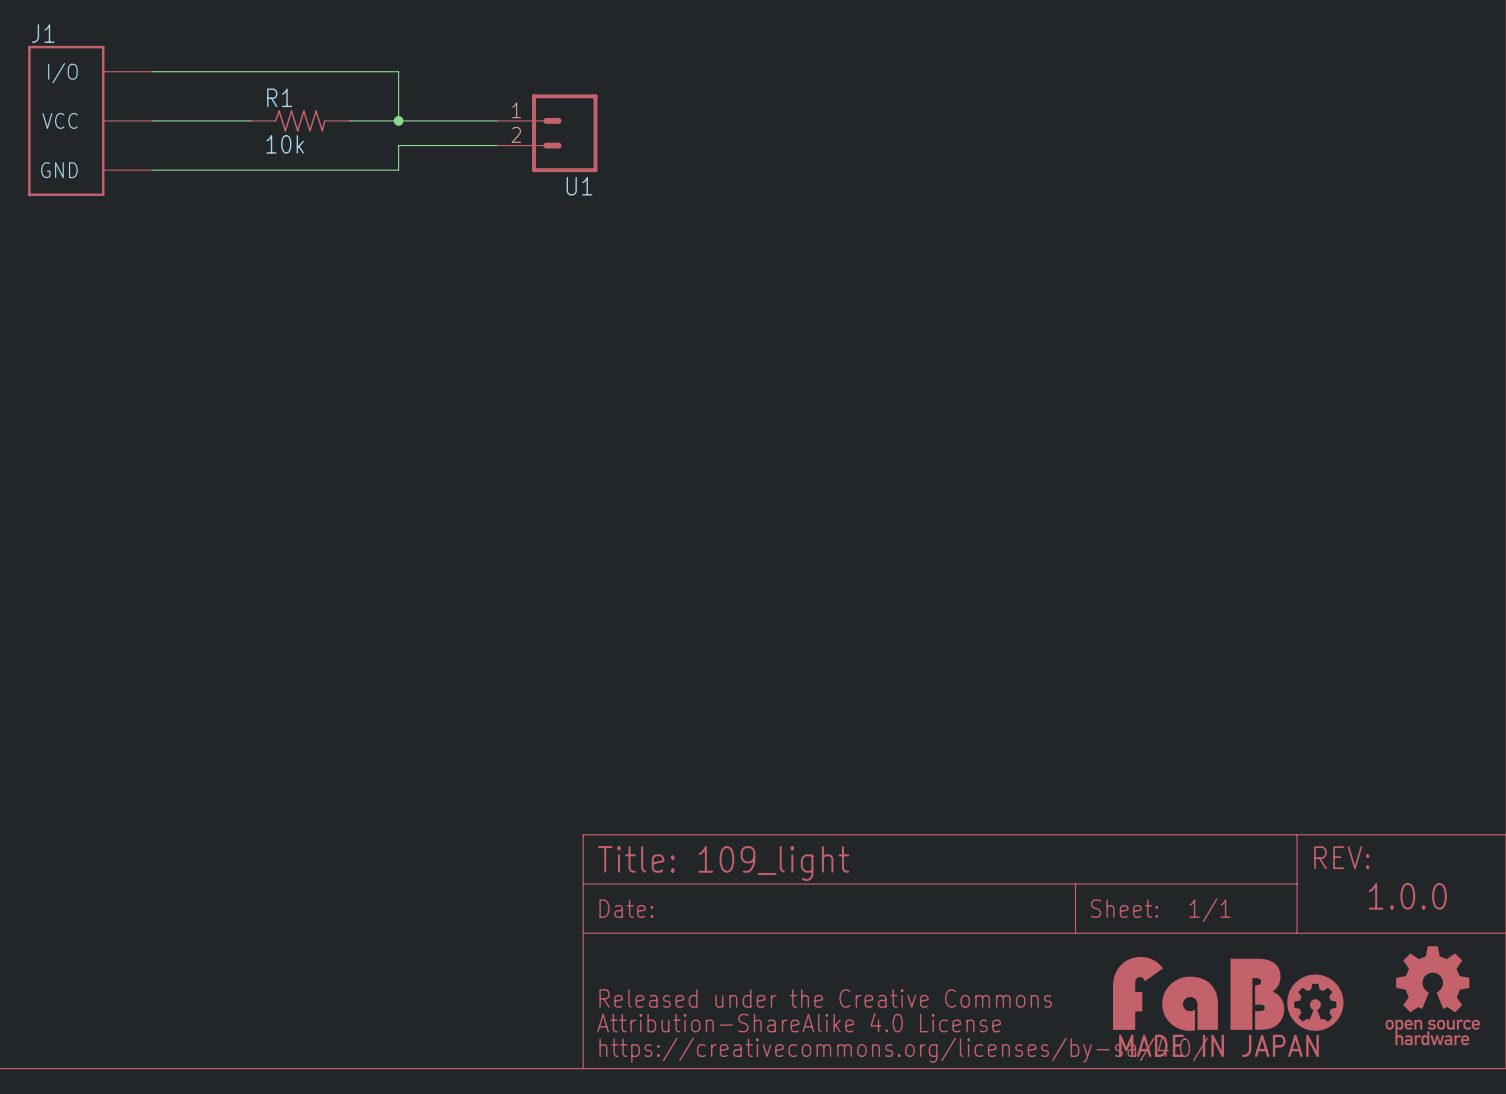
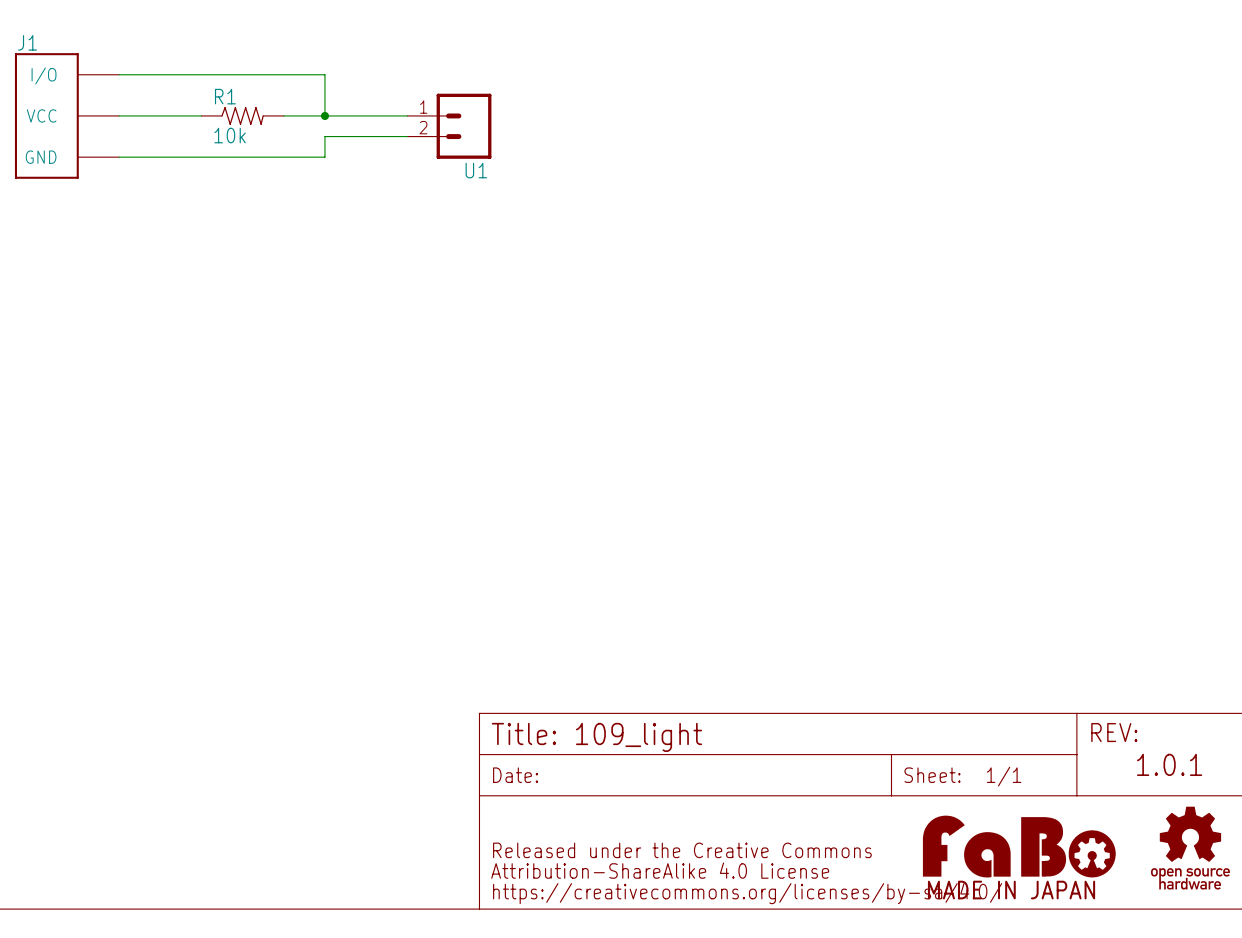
text: 1.0.0 (1407, 896) -> 1.0.1 (1169, 764)

